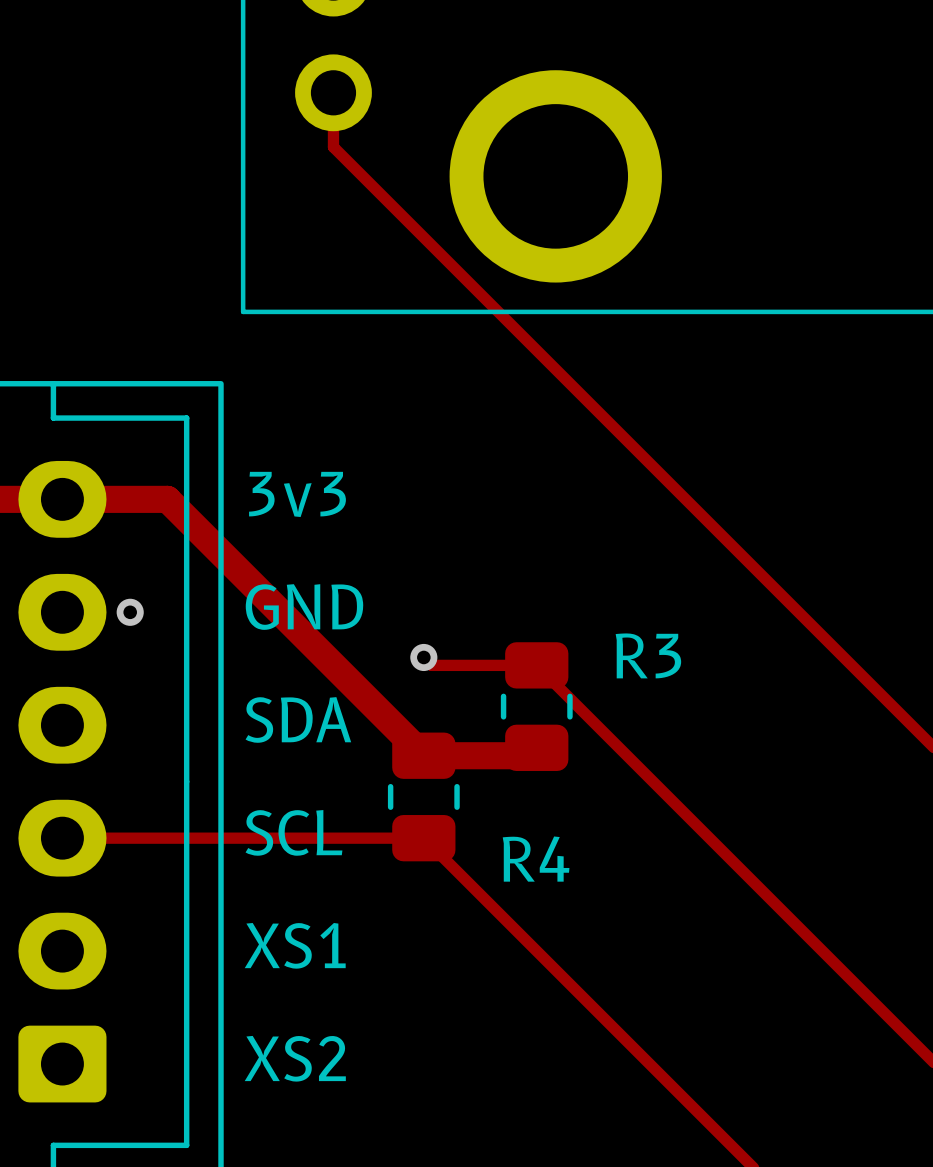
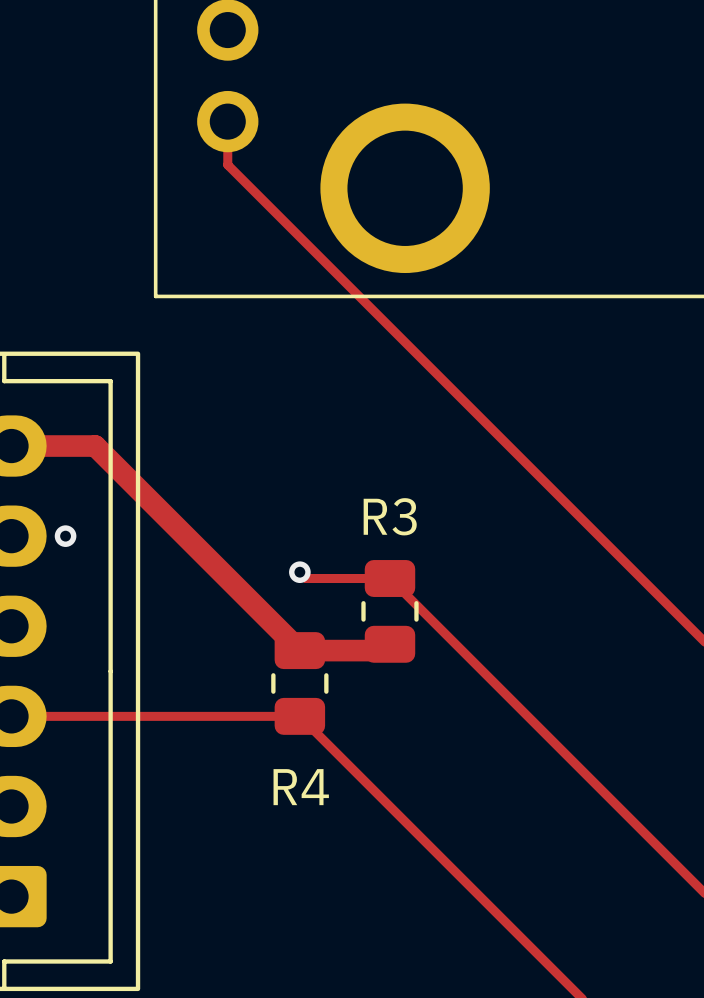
text: 3v3 (297, 494) -> none
text: GND (304, 607) -> none
R3 name position: R3 (648, 655) -> R3 (390, 516)
text: SDA (298, 719) -> none
text: SCL (293, 832) -> none
R4 name position: R4 (536, 859) -> R4 (301, 787)
text: XS1 (295, 945) -> none
text: XS2 (295, 1058) -> none

